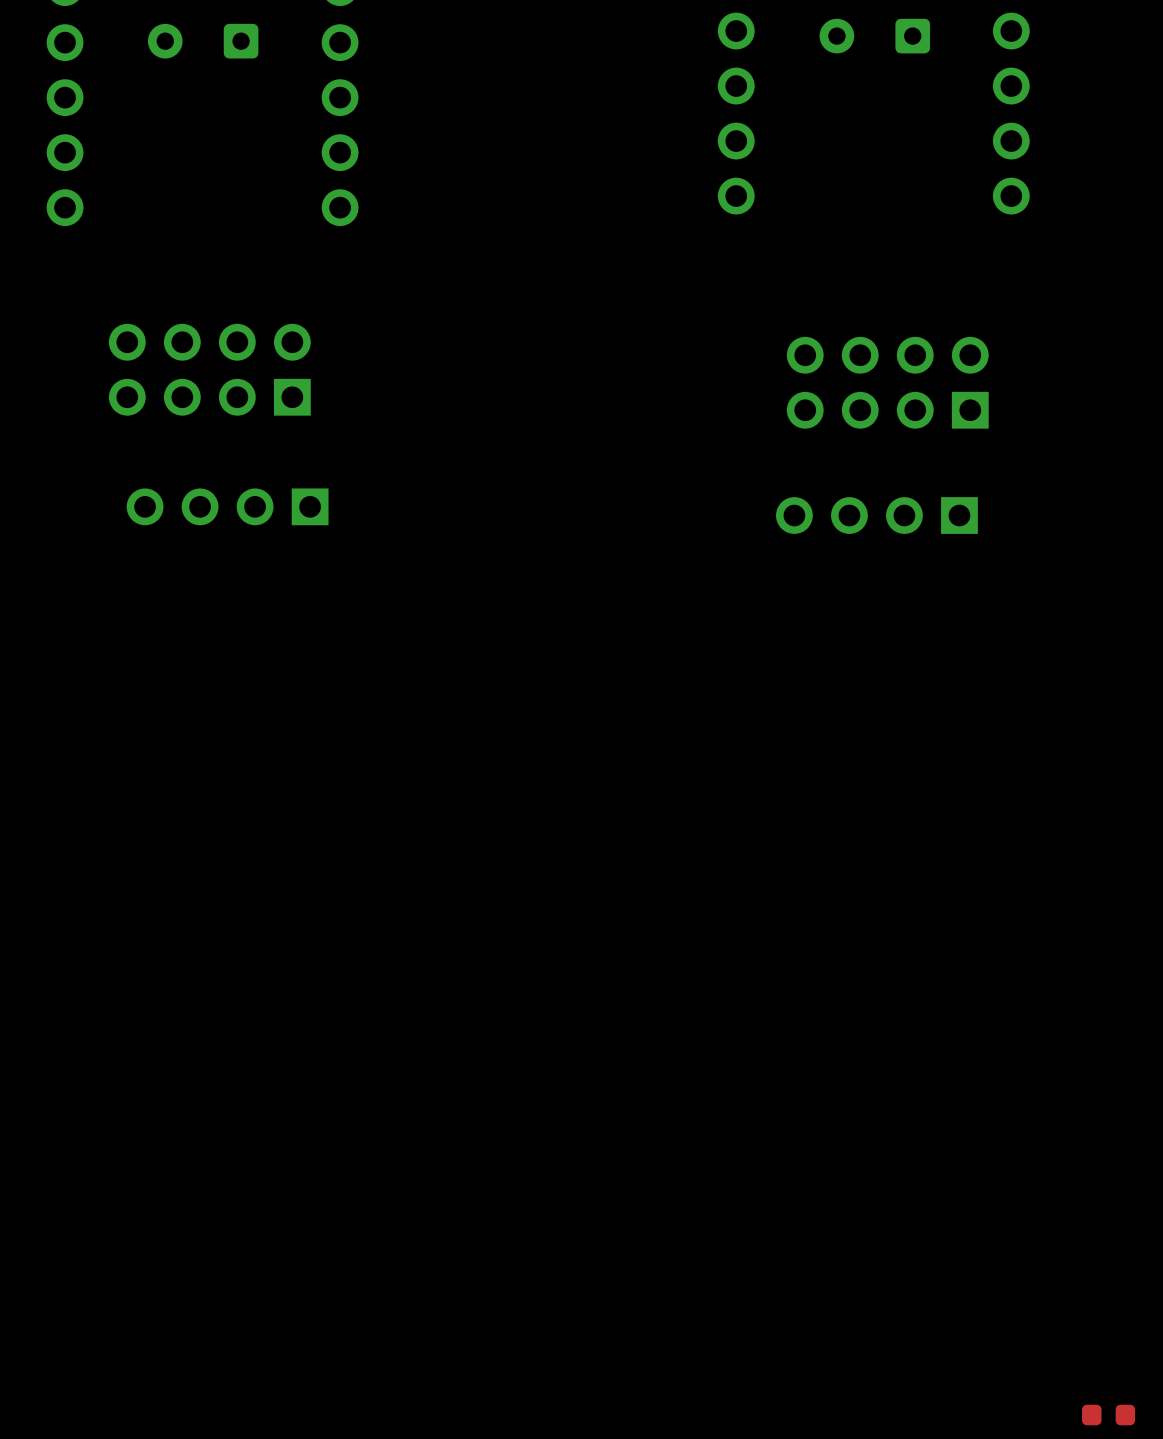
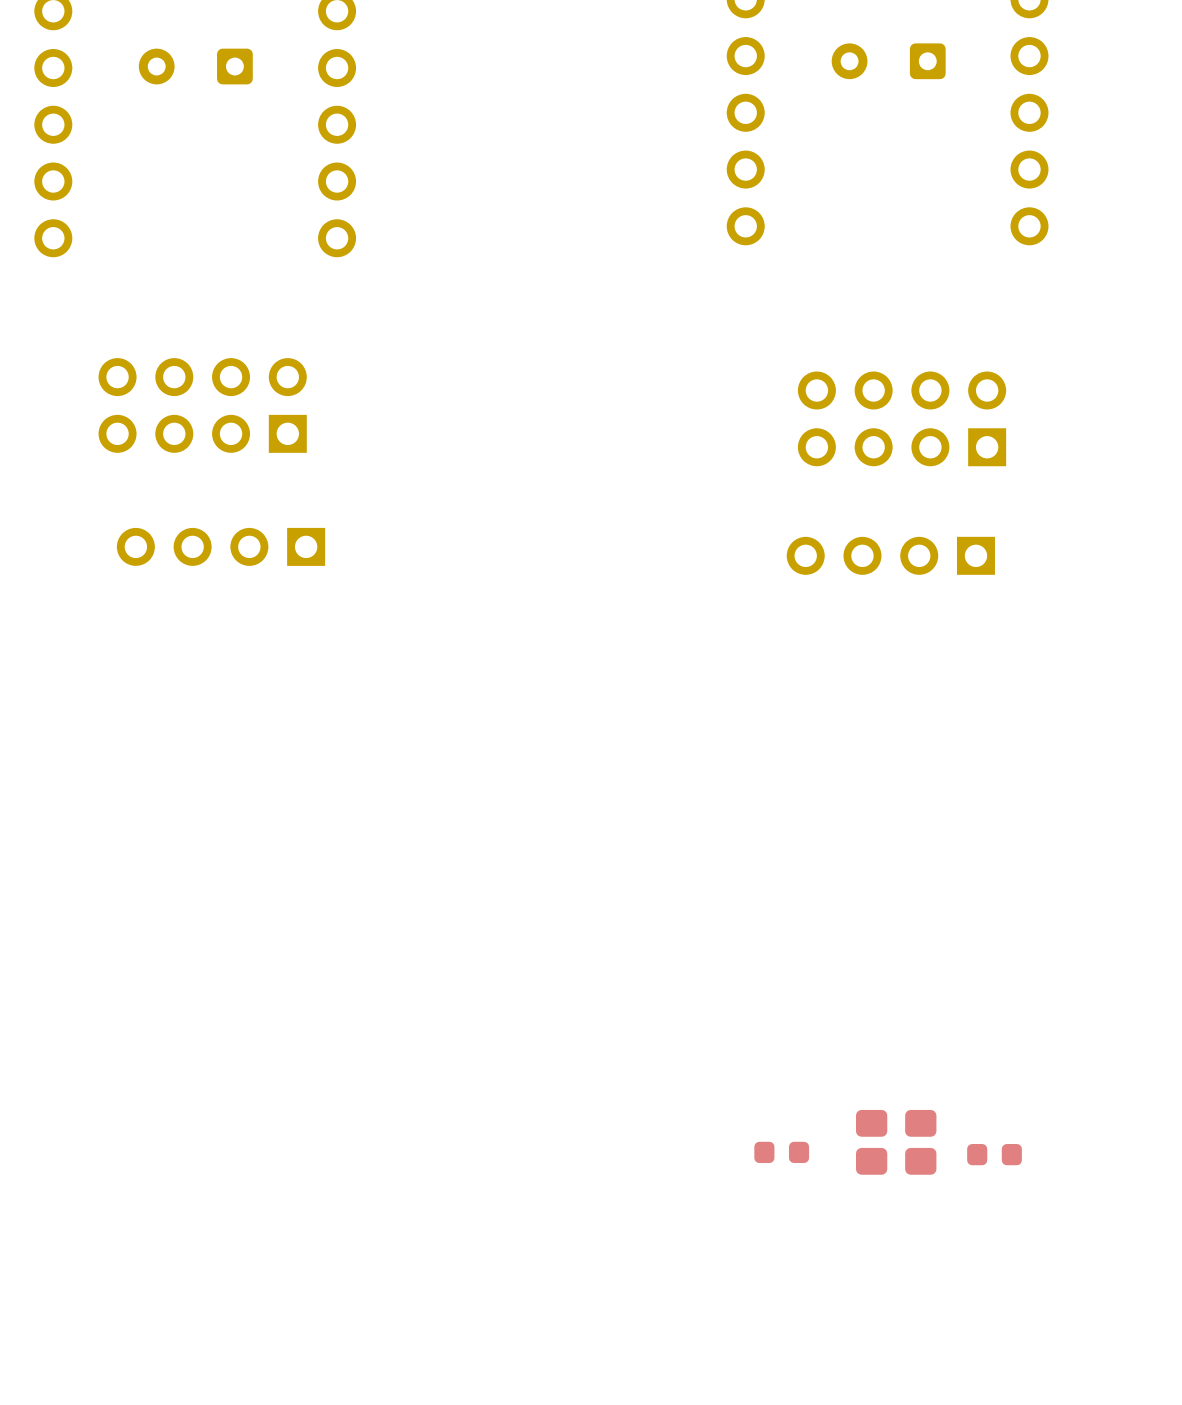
part: none -> (896, 1142)
part: none -> (781, 1152)
part: none -> (994, 1154)

